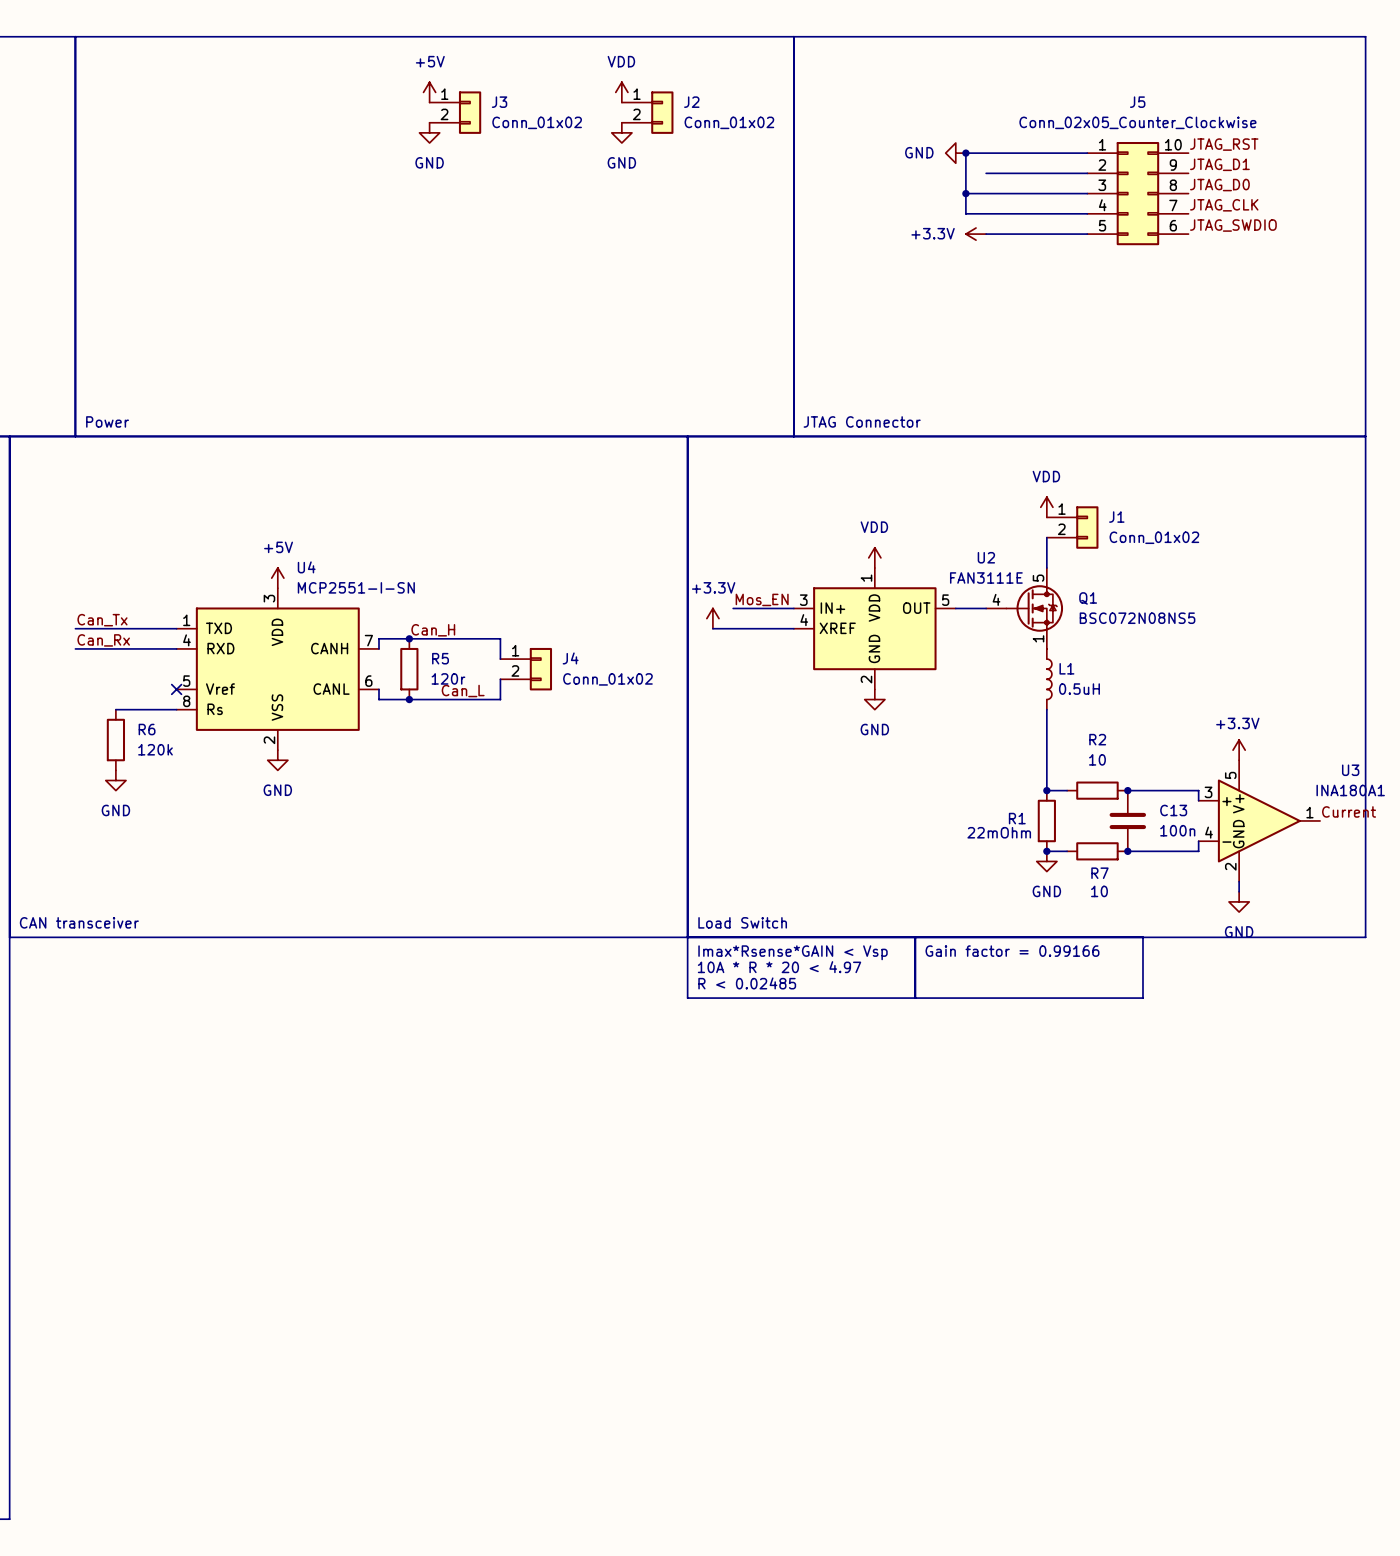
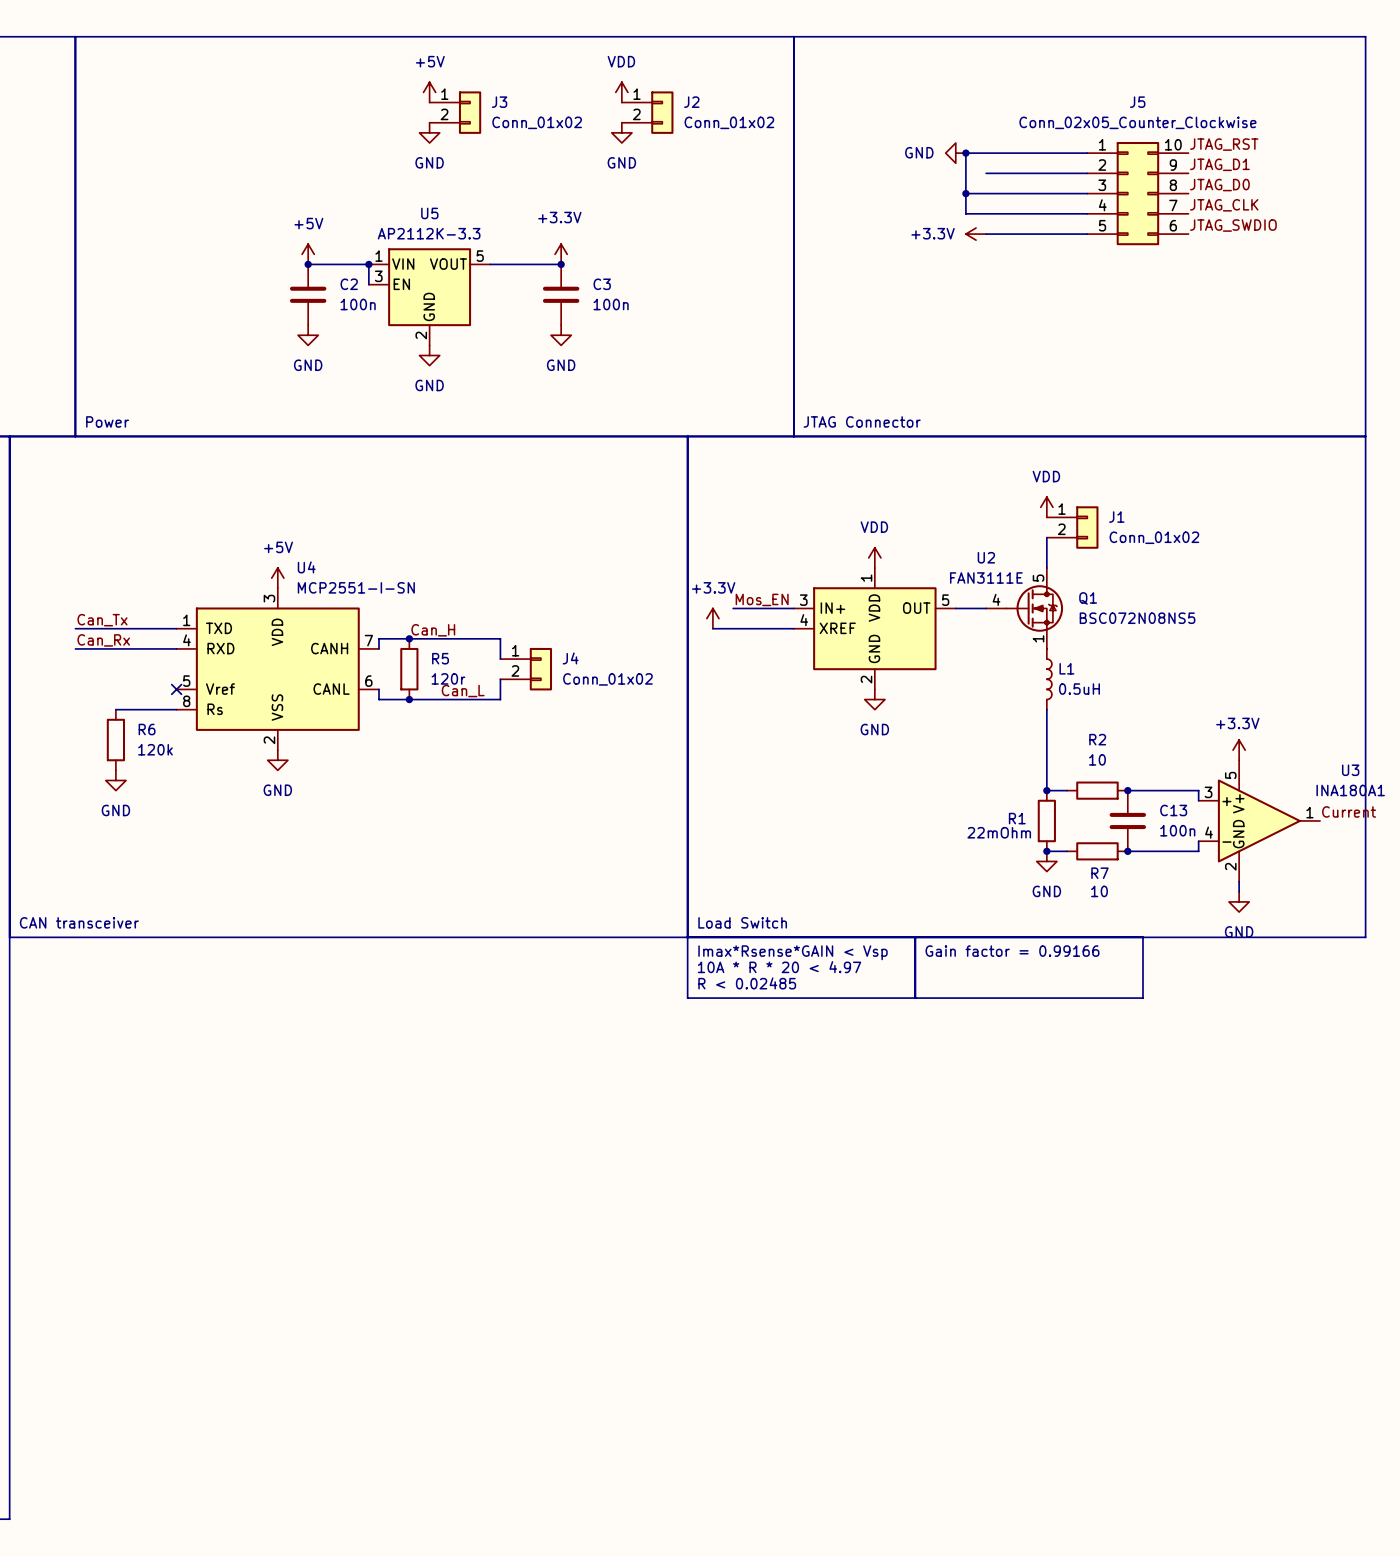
power symbol: none -> +5V (308, 254)
power symbol: none -> +3.3V (561, 254)
wire: none -> (308, 264) (368, 264) (368, 284)
junction: none -> (308, 264)
junction: none -> (368, 264)
wire: none -> (490, 264) (561, 264)
junction: none -> (561, 264)
C2: none -> 100n (308, 294)
C3: none -> 100n (561, 294)
U5: none -> AP2112K-3.3 (429, 296)
power symbol: none -> GND (308, 335)
power symbol: none -> GND (561, 335)
power symbol: none -> GND (429, 355)

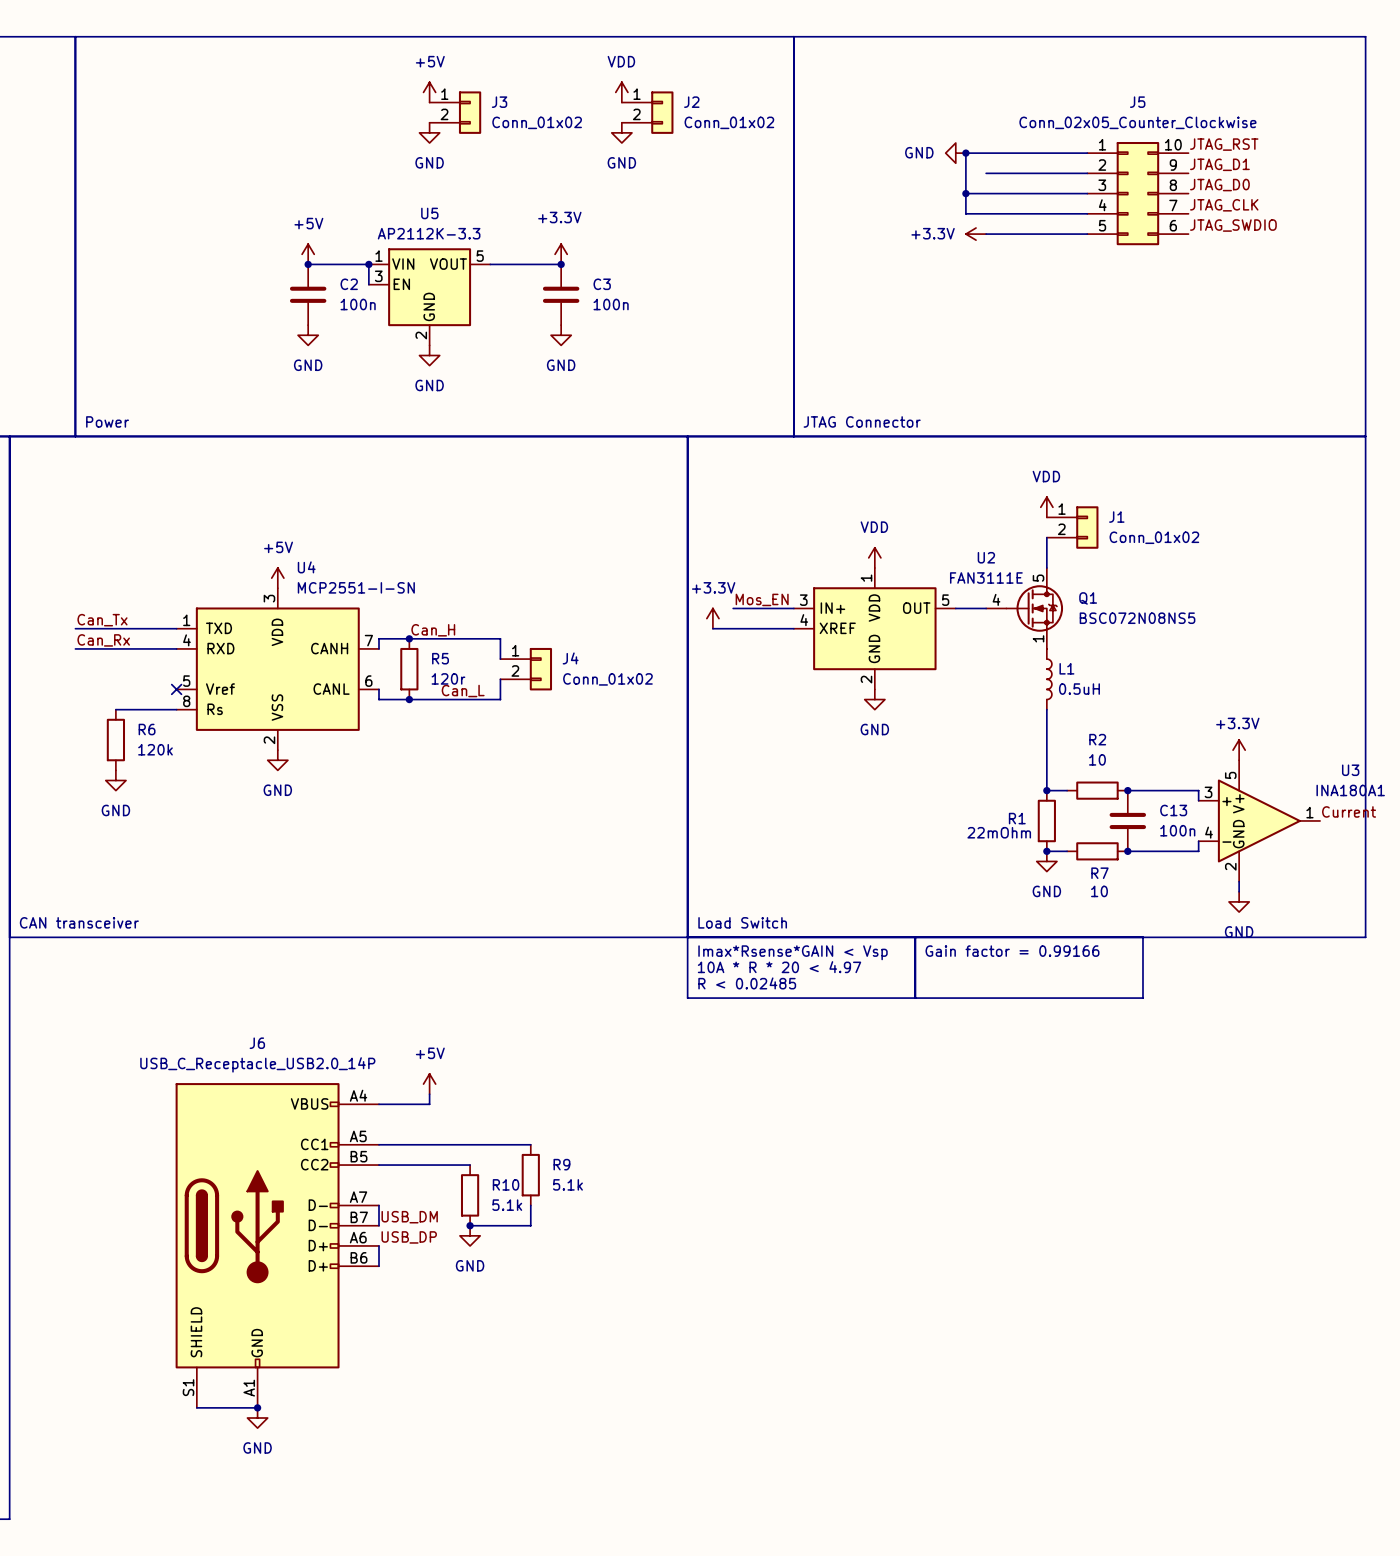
power symbol: none -> +5V (429, 1084)
wire: none -> (429, 1094) (429, 1104) (379, 1104)
wire: none -> (379, 1144) (530, 1144)
wire: none -> (379, 1165) (470, 1165)
R9: none -> 5.1k (530, 1175)
R10: none -> 5.1k (470, 1195)
wire: none -> (379, 1205) (379, 1225)
wire: none -> (530, 1205) (530, 1225) (470, 1225)
label: none -> USB_DM (409, 1217)
junction: none -> (470, 1225)
power symbol: none -> GND (470, 1235)
label: none -> USB_DP (409, 1237)
J6: none -> USB_C_Receptacle_USB2.0_14P (277, 1245)
wire: none -> (379, 1245) (379, 1266)
wire: none -> (196, 1407) (257, 1407)
junction: none -> (257, 1407)
power symbol: none -> GND (257, 1418)

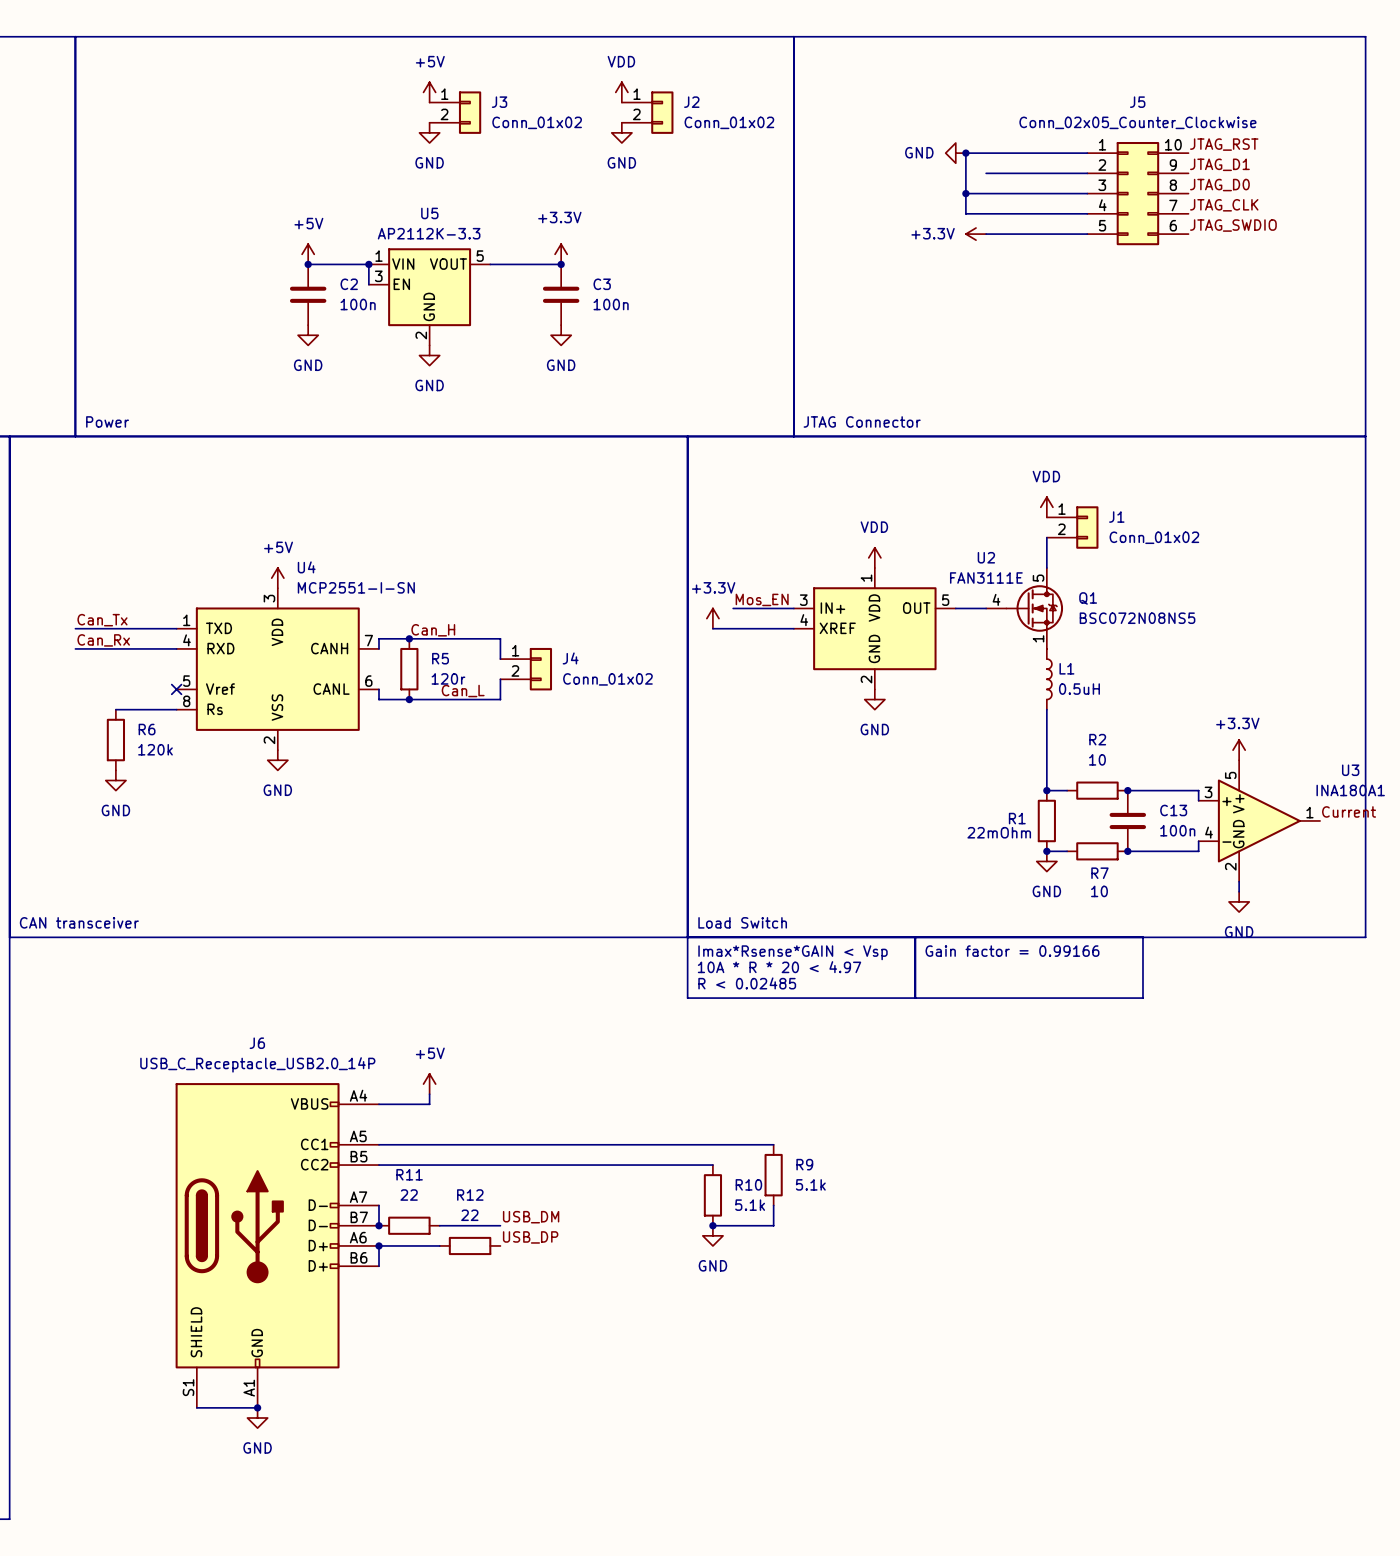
wire: none -> (530, 1144) (773, 1144)
wire: none -> (470, 1165) (712, 1165)
R9 position: (530, 1175) -> (773, 1175)
R10 position: (470, 1195) -> (712, 1195)
wire: (530, 1205) (530, 1225) (500, 1225) -> none
wire: none -> (773, 1205) (773, 1225) (712, 1225)
label position: USB_DM (409, 1217) -> USB_DM (531, 1217)
junction: none -> (379, 1225)
R11: none -> 22 (409, 1225)
wire: none -> (439, 1225) (470, 1225)
junction: (470, 1225) -> none
junction: none -> (712, 1225)
power symbol: GND (470, 1235) -> none
power symbol: none -> GND (712, 1235)
label position: USB_DP (409, 1237) -> USB_DP (530, 1237)
wire: none -> (379, 1245) (439, 1245)
junction: none -> (379, 1245)
R12: none -> 22 (470, 1245)

